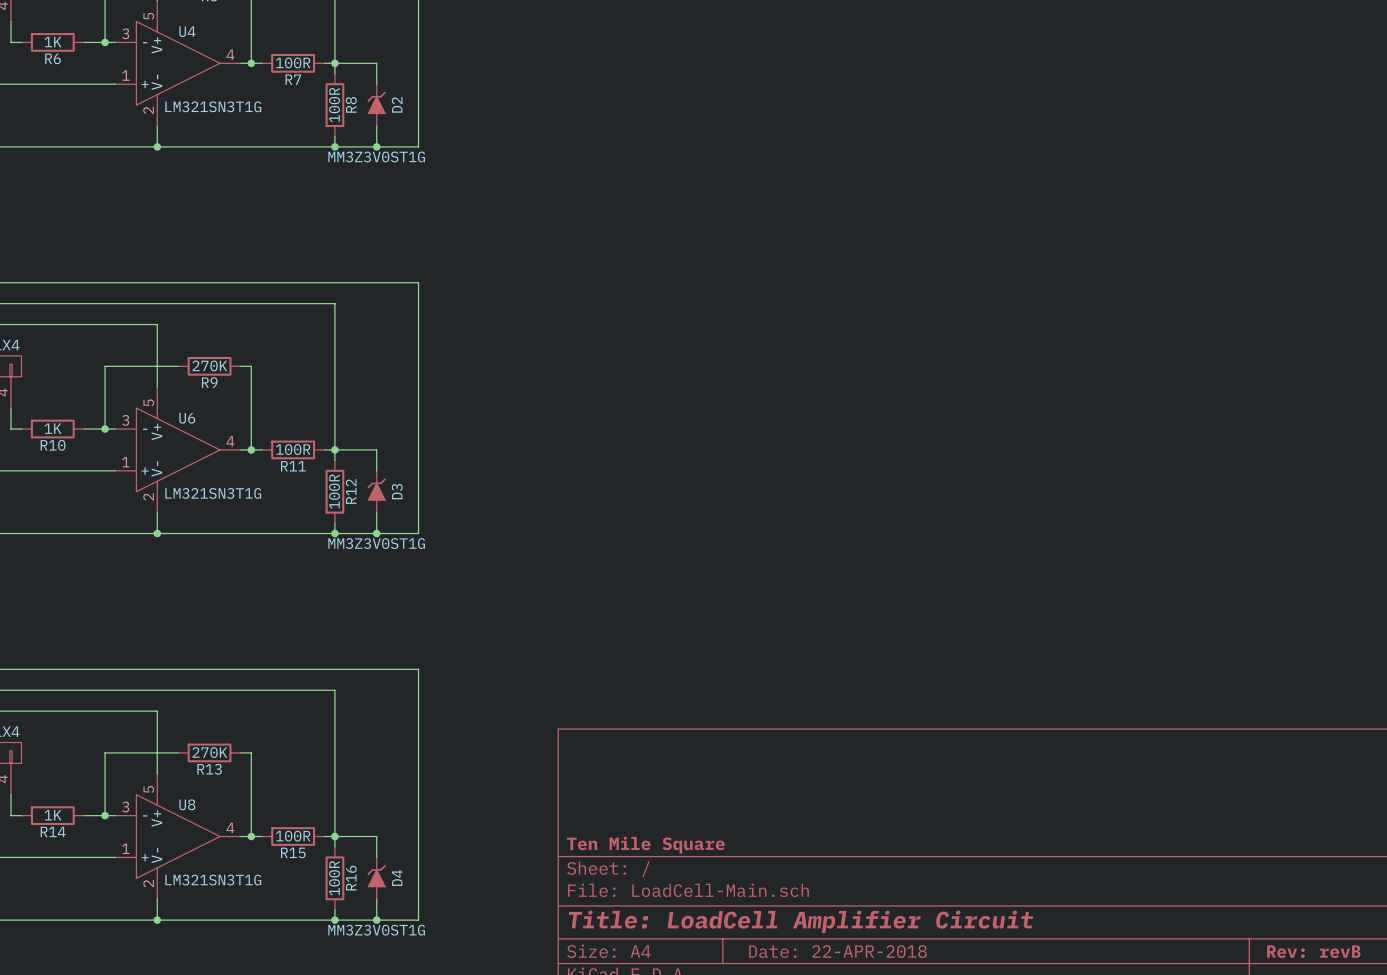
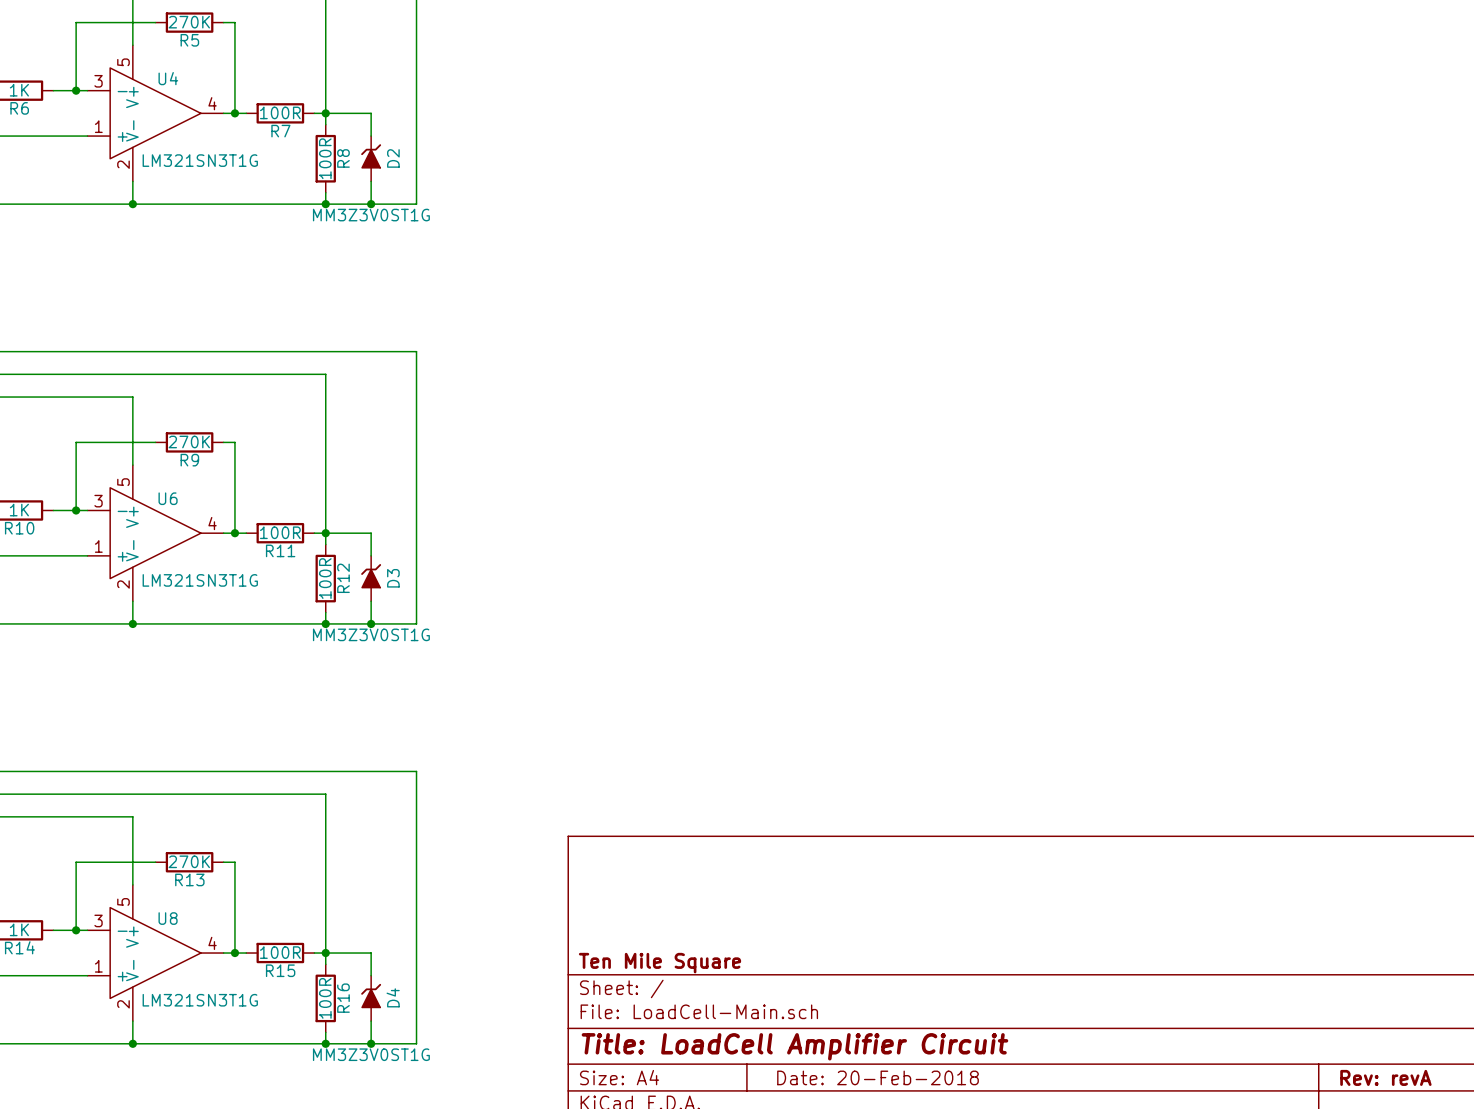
title block: Date: 22-APR-2018 (838, 951) -> Date: 20-Feb-2018 (878, 1077)
title block: Rev: revB (1313, 951) -> Rev: revA (1385, 1077)

